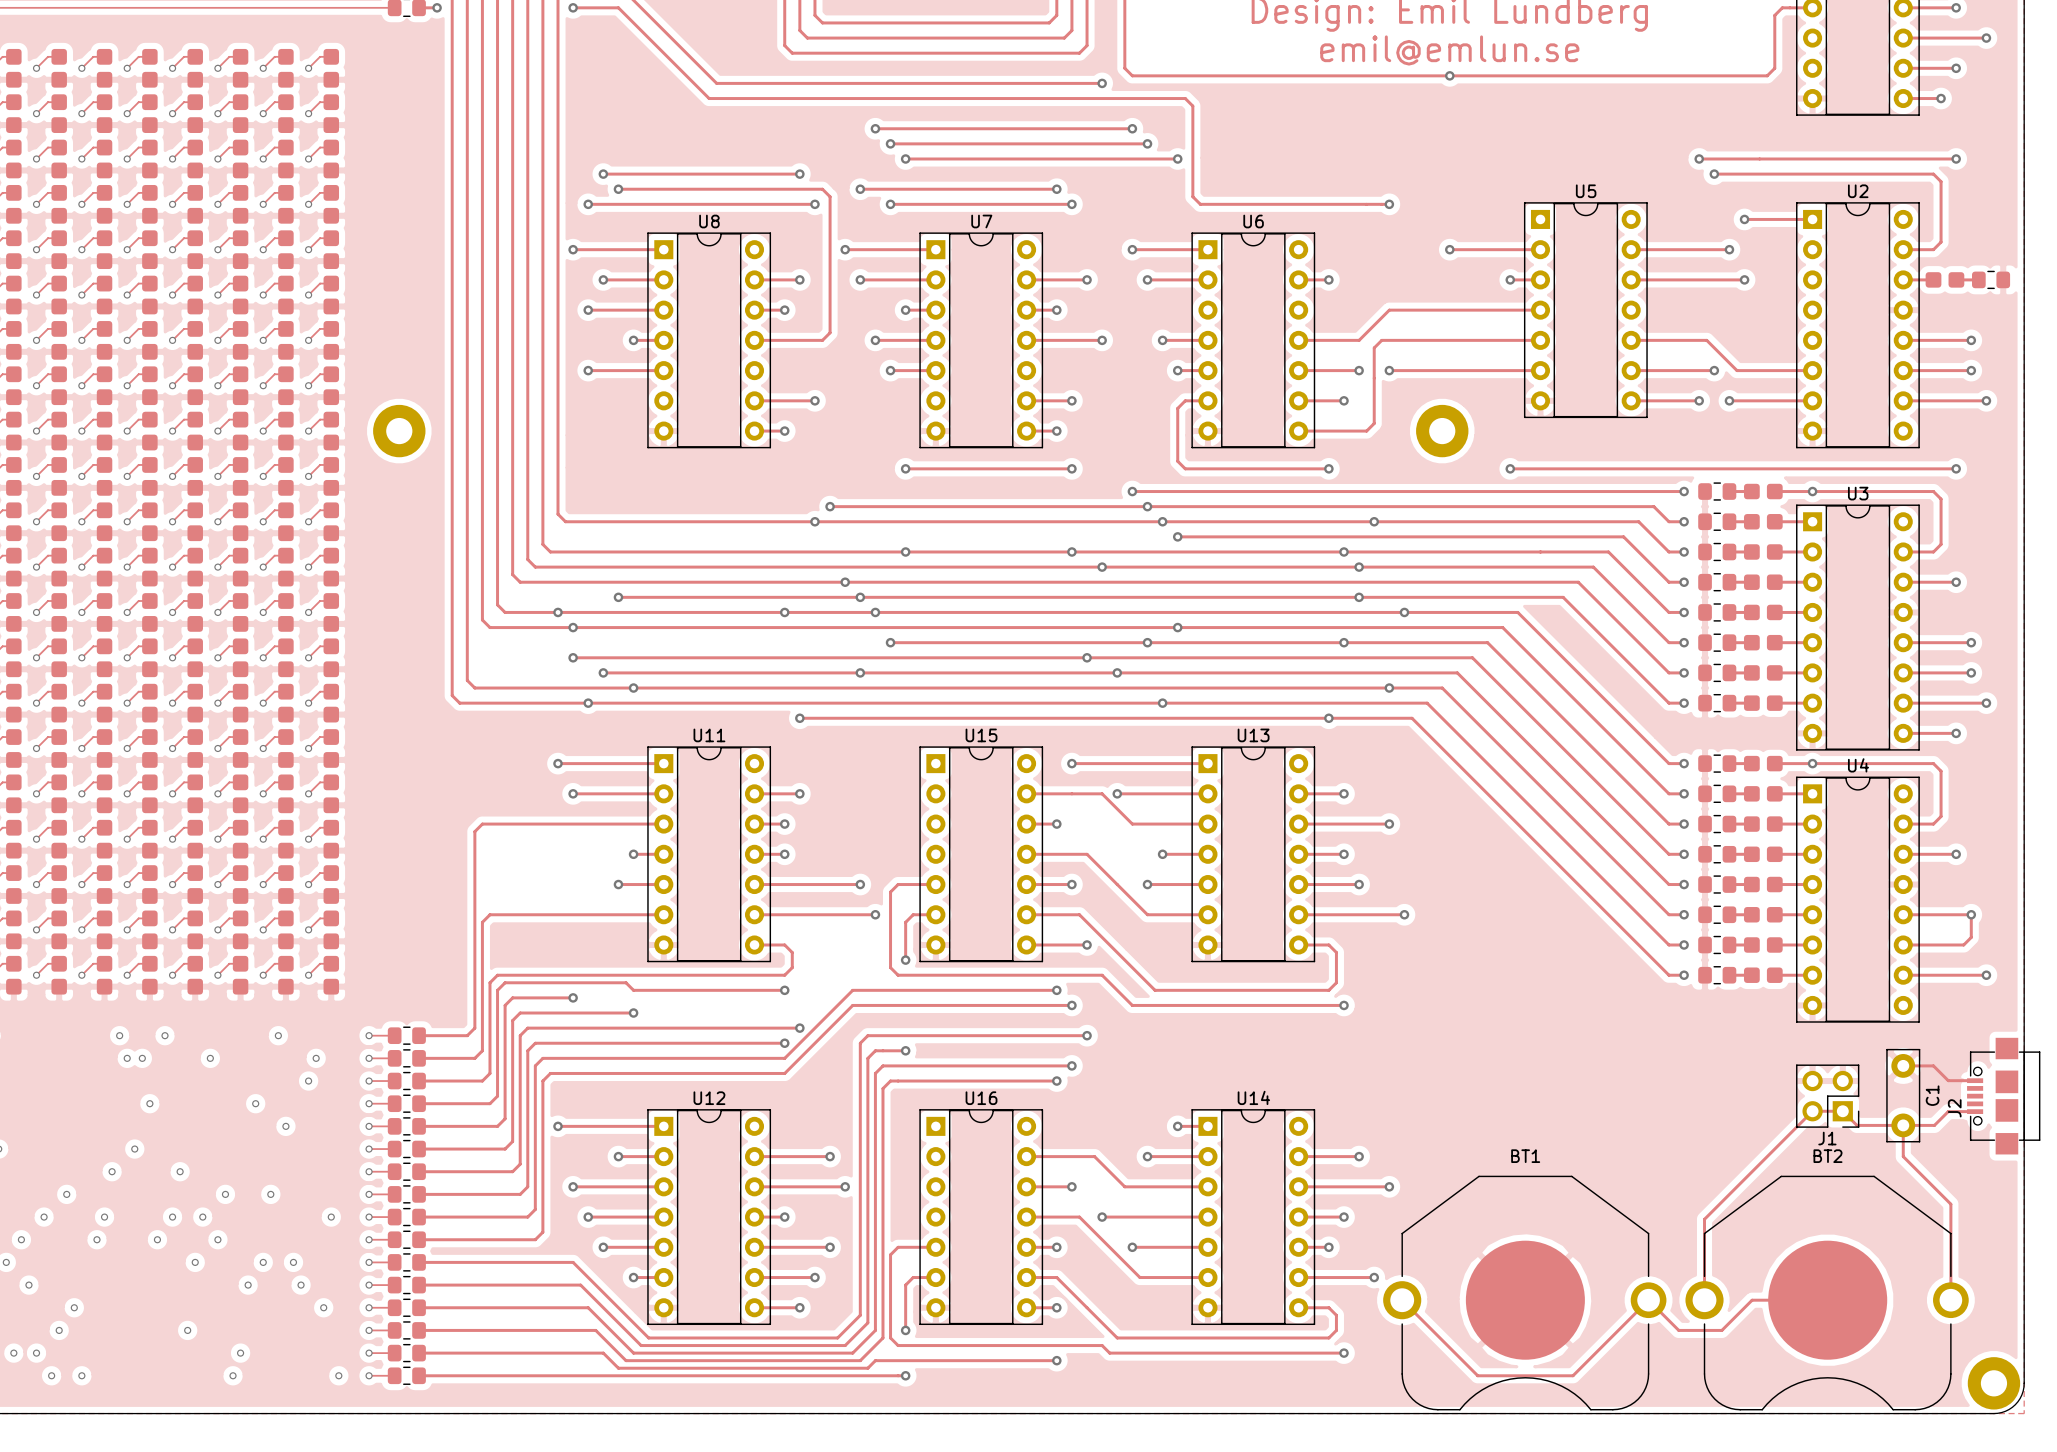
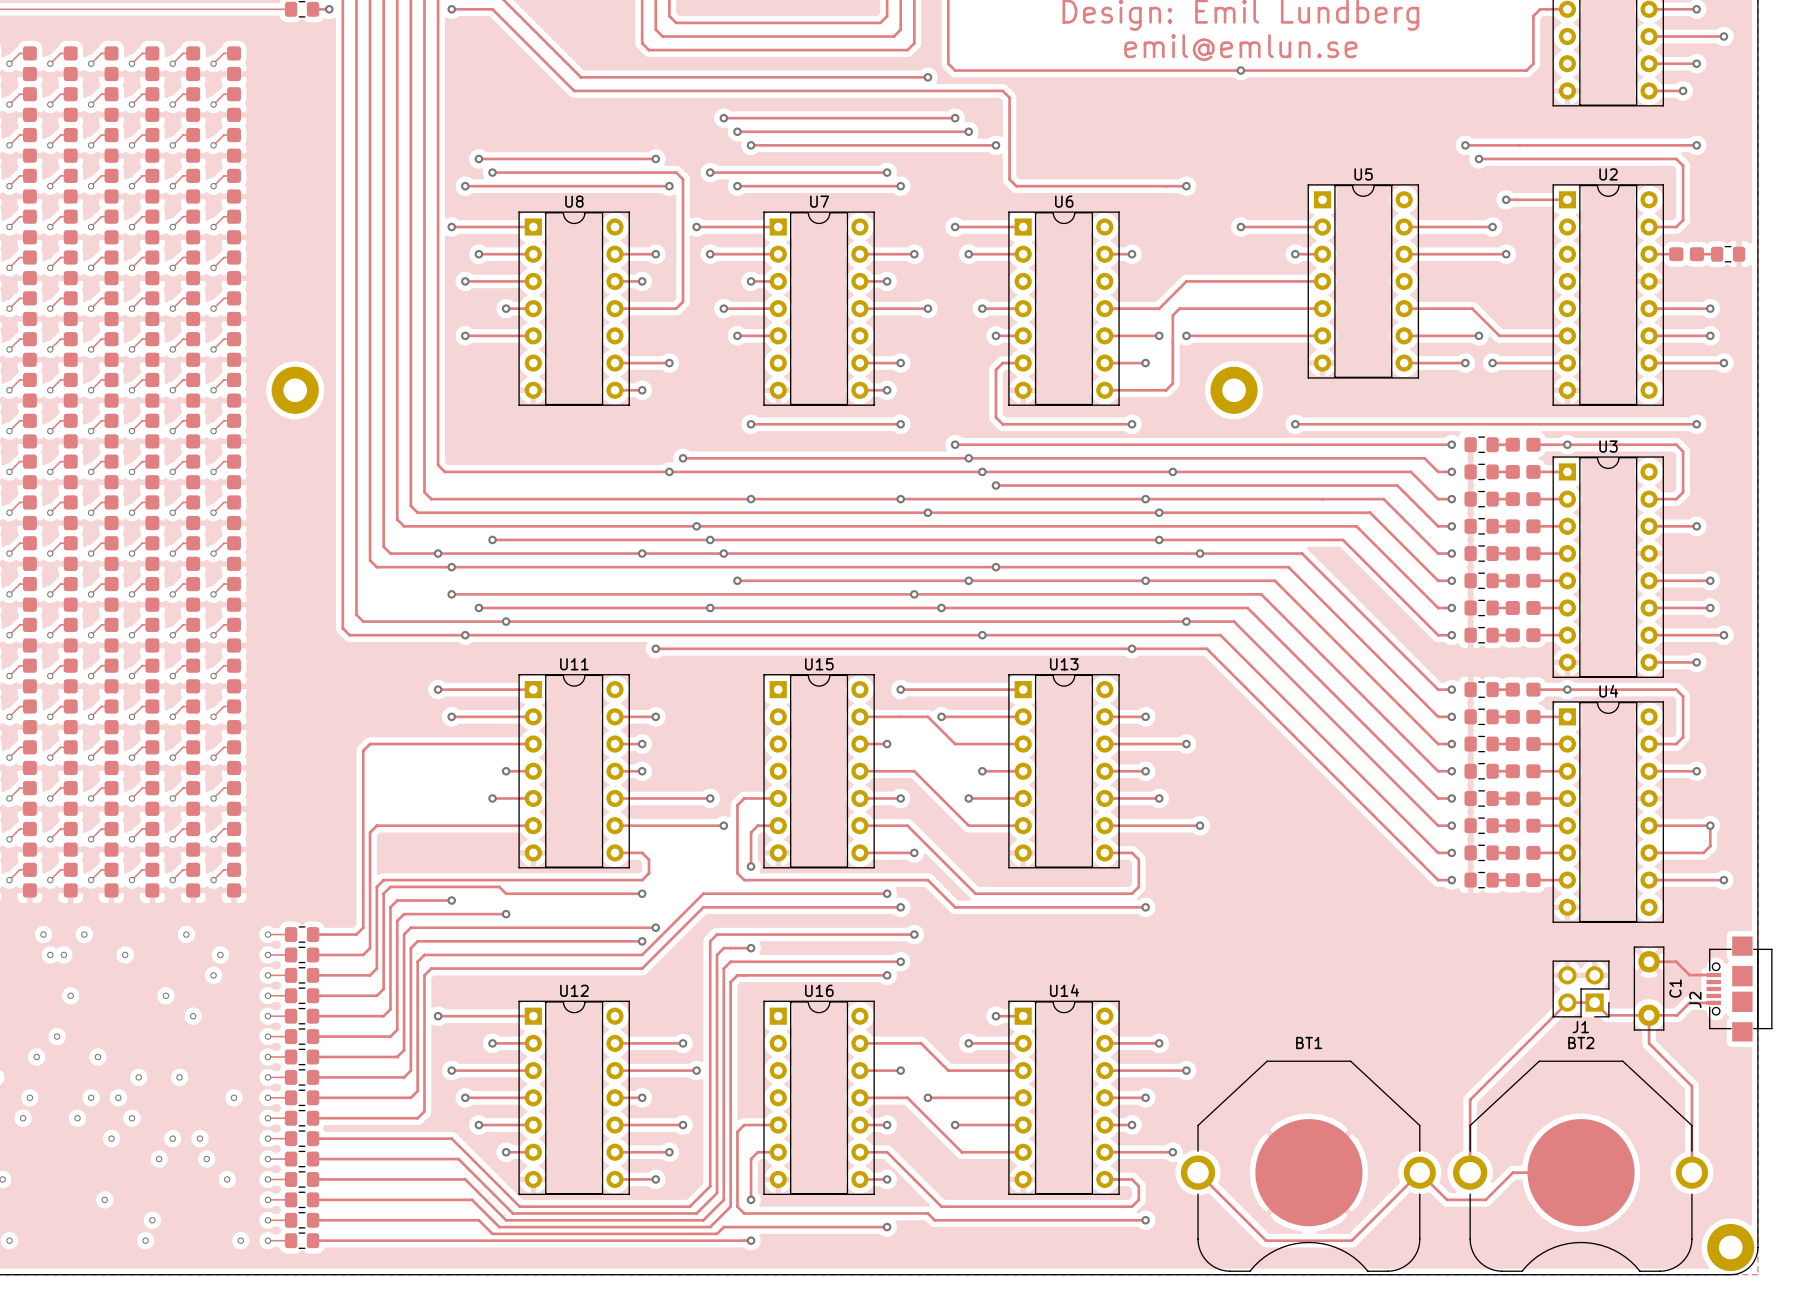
BT1 footprint: [1383, 1175, 1667, 1411] -> [1180, 1060, 1436, 1272]
BT2 footprint: [1685, 1175, 1969, 1411] -> [1453, 1060, 1709, 1272]

